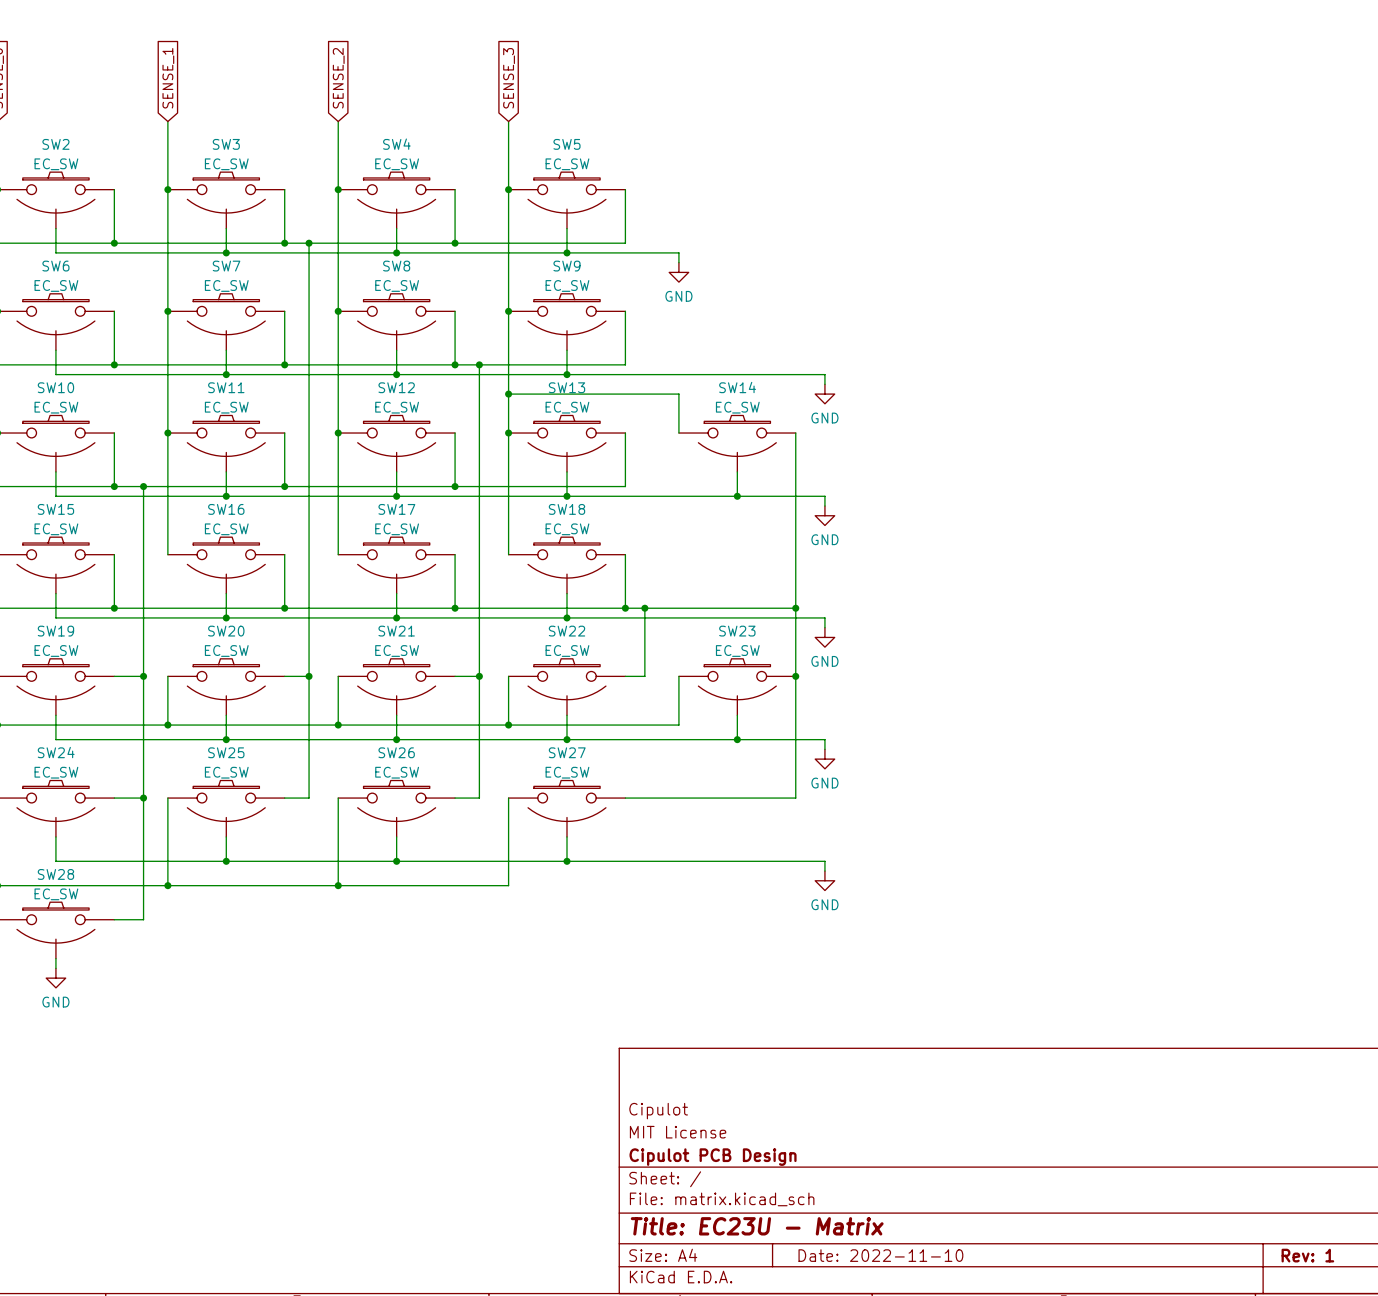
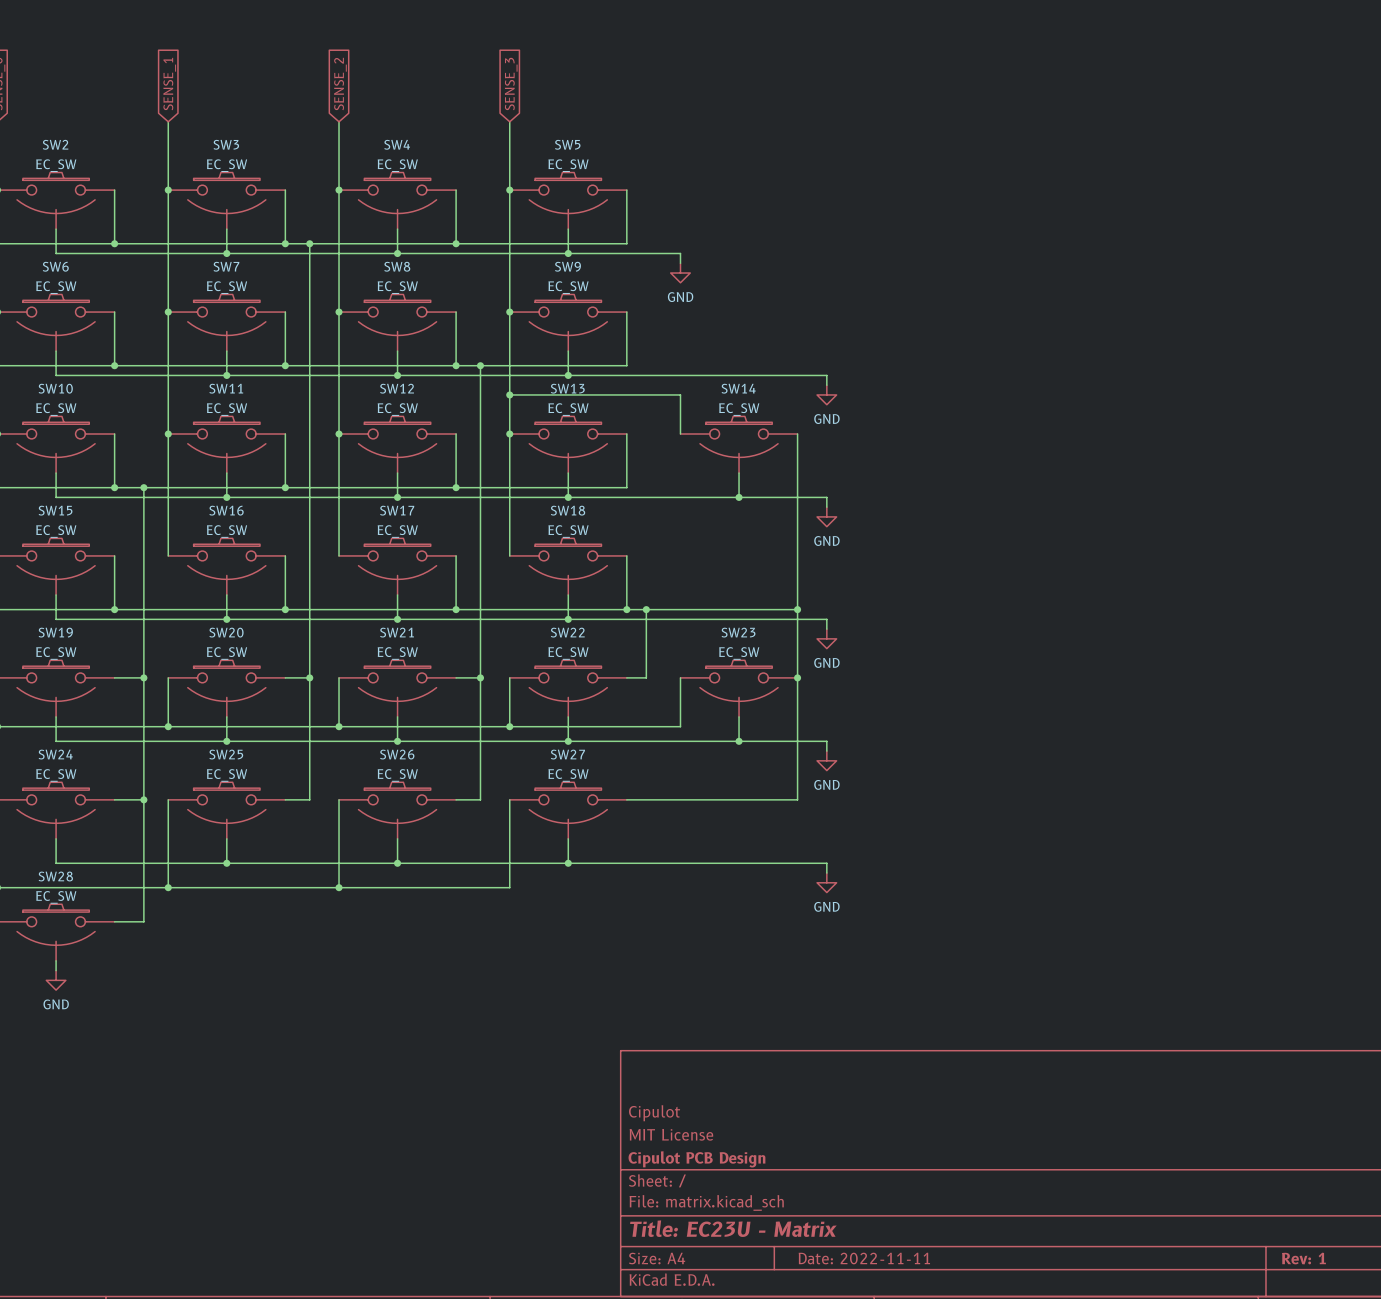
title block: Date: 2022-11-10 (880, 1255) -> Date: 2022-11-11 (864, 1258)

